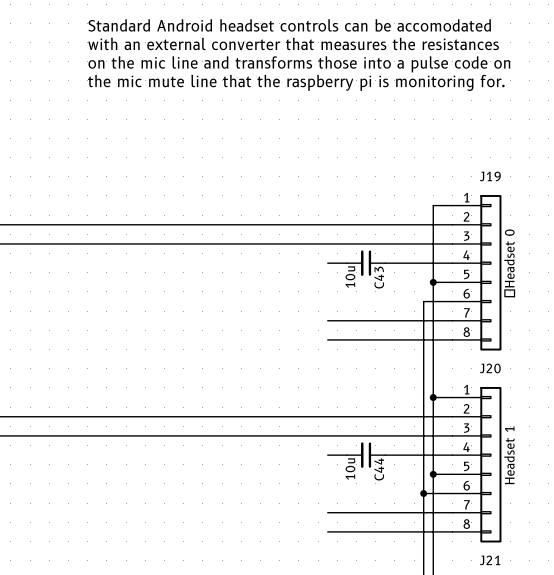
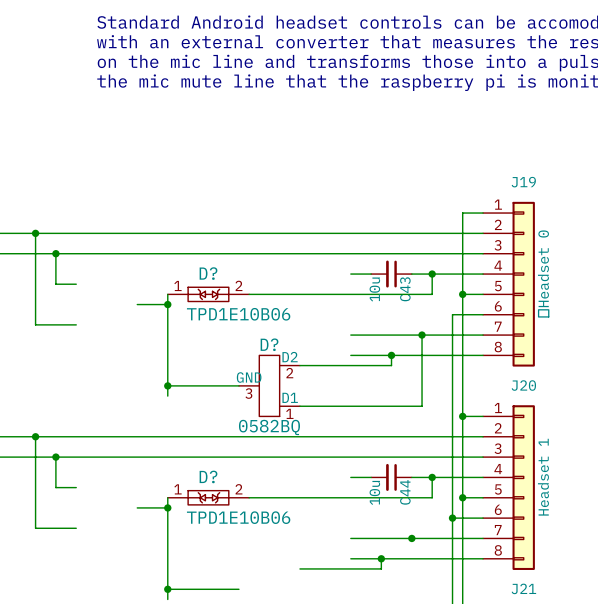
wire: none -> (35, 233) (35, 324) (76, 324)
junction: none -> (35, 233)
wire: none -> (55, 253) (55, 284) (76, 284)
junction: none -> (55, 253)
wire: none -> (432, 274) (432, 294) (249, 294)
junction: none -> (432, 274)
wire: none -> (167, 294) (167, 396)
D?: none -> TPD1E10B06 (208, 294)
wire: none -> (137, 304) (167, 304)
junction: none -> (167, 304)
wire: none -> (422, 335) (422, 406) (299, 406)
junction: none -> (422, 335)
wire: none -> (391, 355) (391, 365) (299, 365)
junction: none -> (391, 355)
wire: none -> (167, 385) (238, 385)
junction: none -> (167, 385)
D?: none -> 0582BQ (269, 385)
wire: none -> (35, 436) (35, 528) (76, 528)
junction: none -> (35, 436)
wire: none -> (55, 457) (55, 487) (76, 487)
junction: none -> (55, 457)
wire: none -> (432, 477) (432, 497) (249, 497)
junction: none -> (432, 477)
wire: none -> (167, 497) (167, 599)
D?: none -> TPD1E10B06 (208, 497)
wire: none -> (137, 507) (167, 507)
junction: none -> (167, 507)
junction: none -> (411, 538)
wire: none -> (381, 558) (381, 568) (299, 568)
junction: none -> (381, 558)
wire: none -> (167, 589) (238, 589)
junction: none -> (167, 589)

